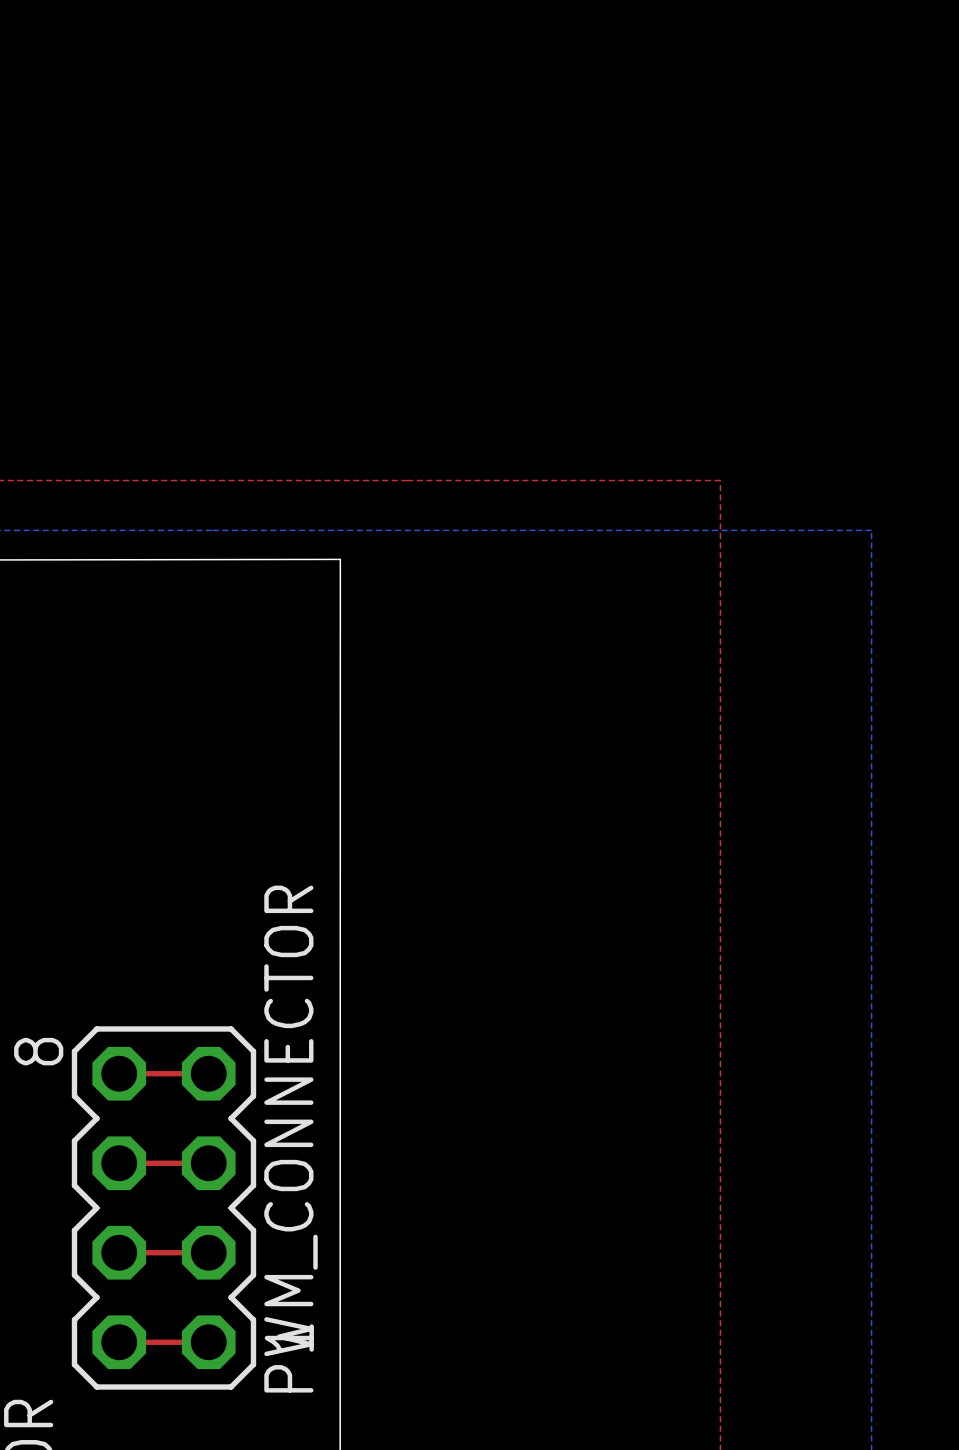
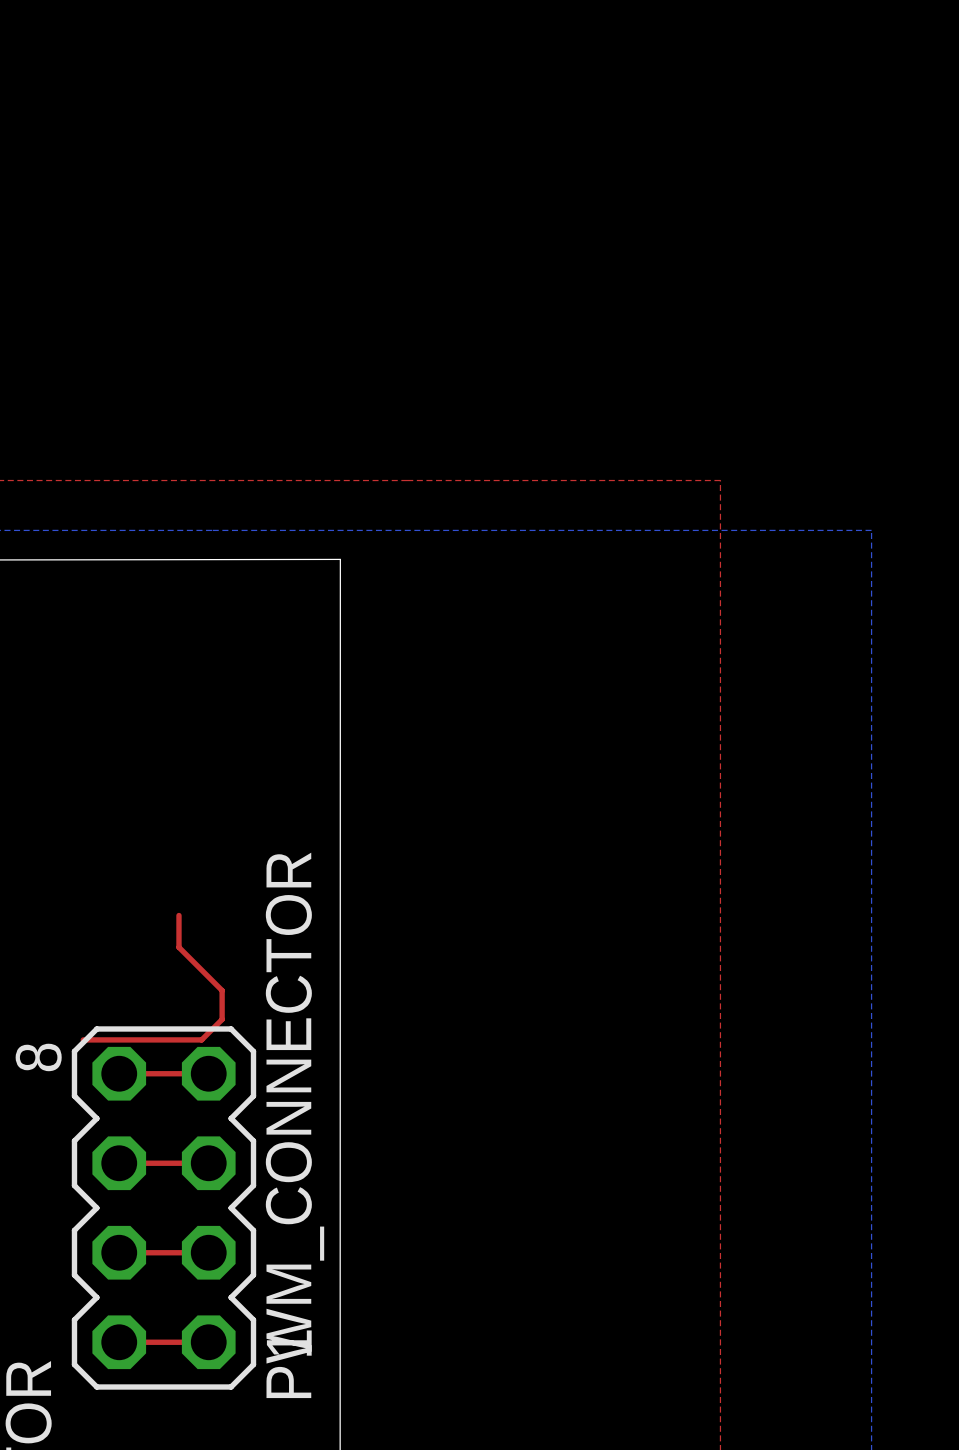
top track: none -> (178, 915) (178, 947) (222, 990) (222, 1019) (201, 1039) (83, 1039)

